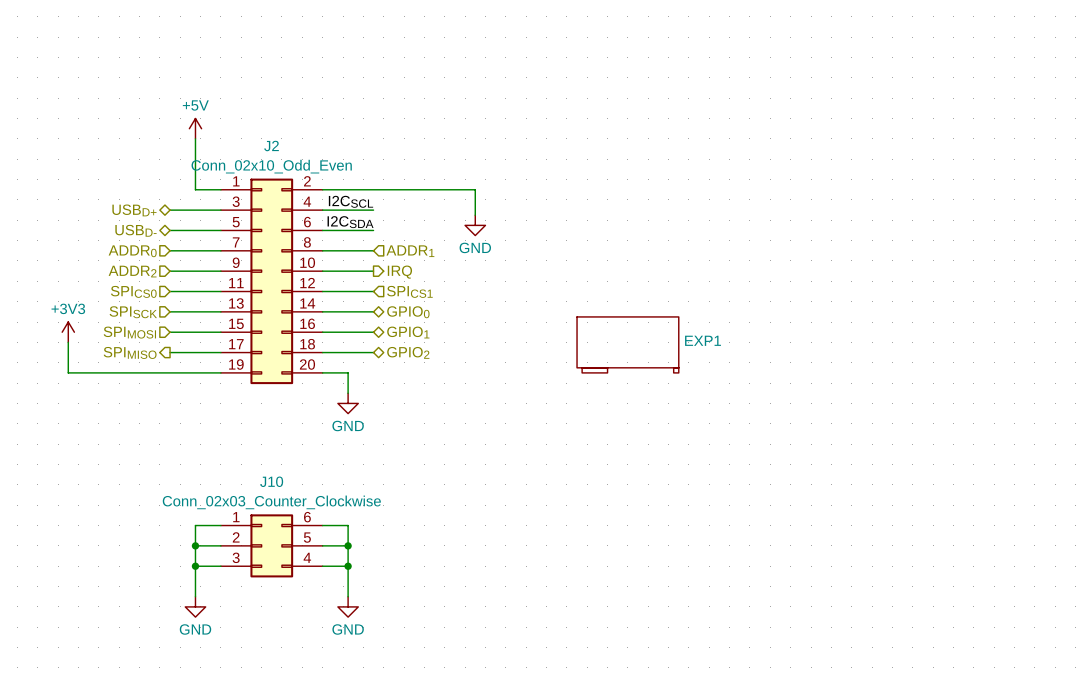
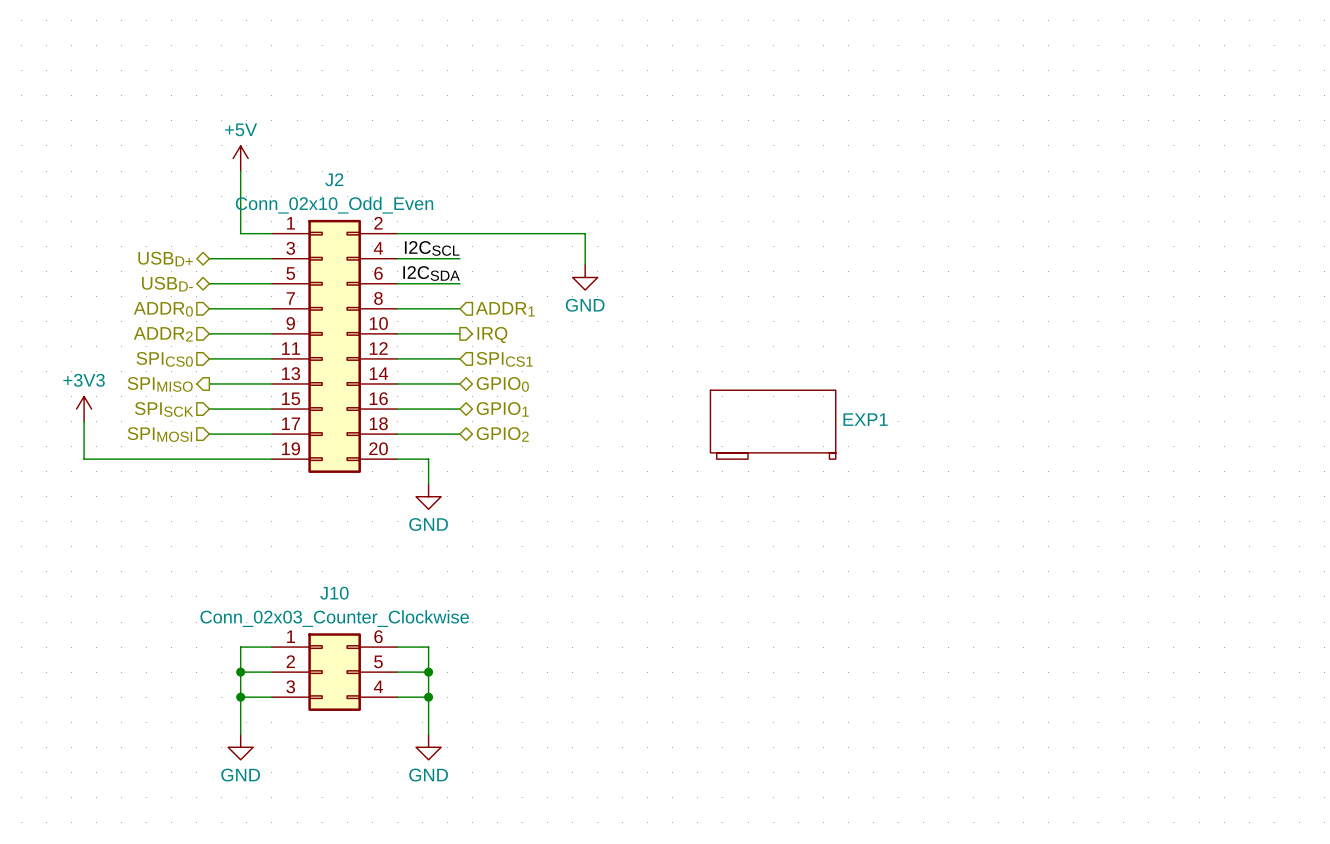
hierarchical label shape: input (133, 312) -> output (160, 384)
hierarchical label: SPISCK (133, 312) -> SPIMISO (160, 384)
hierarchical label: SPIMOSI (129, 332) -> SPISCK (164, 409)
hierarchical label shape: output (130, 352) -> input (159, 434)
hierarchical label: SPIMISO (130, 352) -> SPIMOSI (159, 434)

